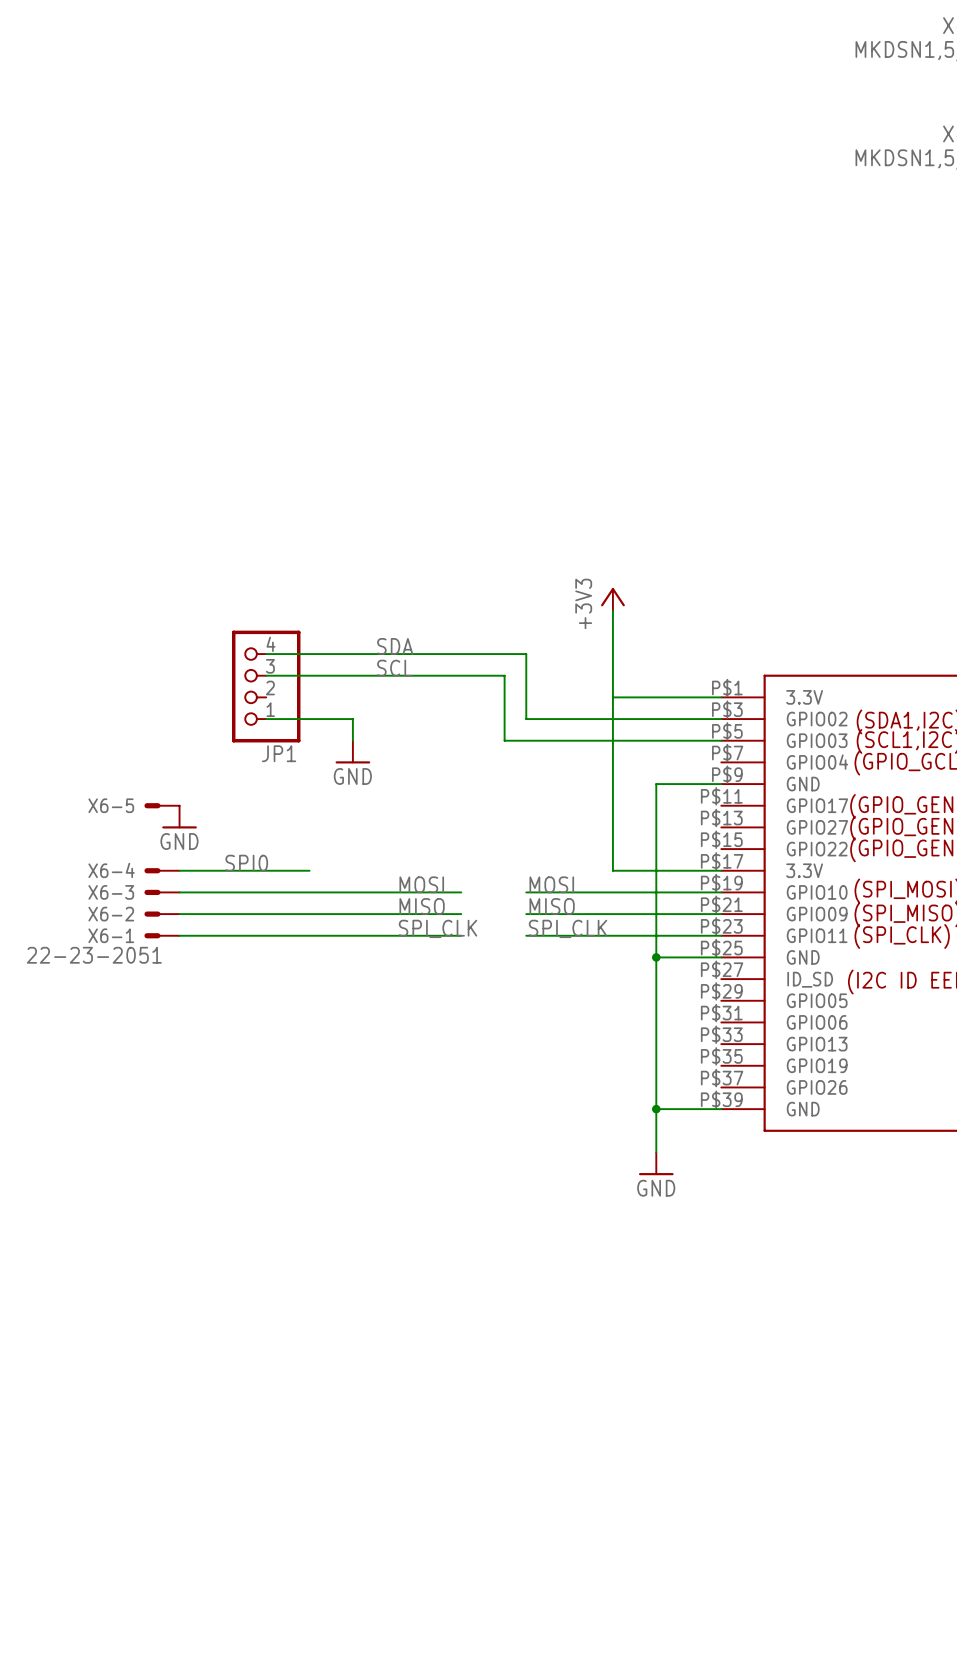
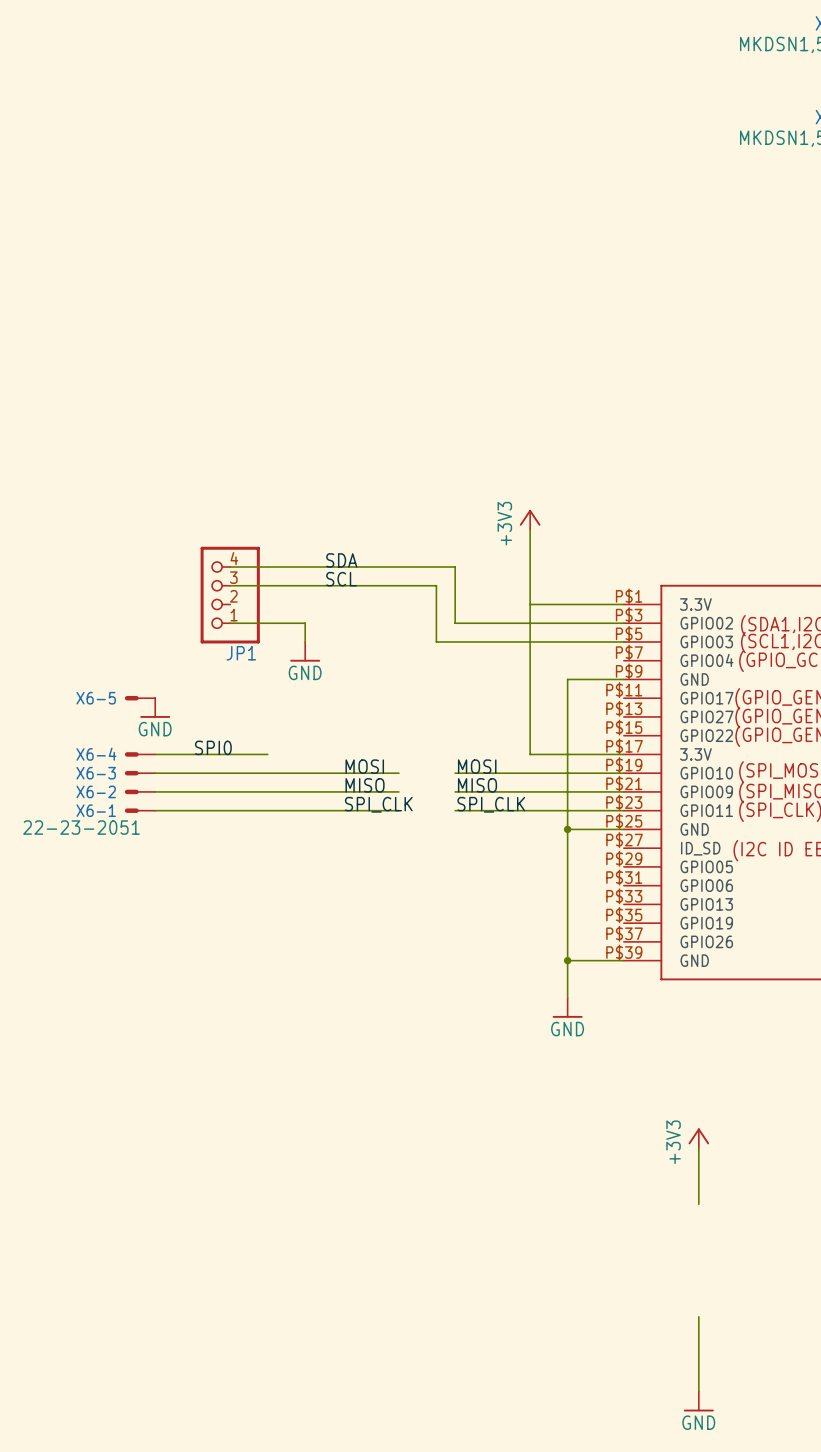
power symbol: none -> +3V3 (698, 1138)
wire: none -> (698, 1148) (698, 1204)
wire: none -> (698, 1316) (698, 1391)
power symbol: none -> GND (698, 1401)

